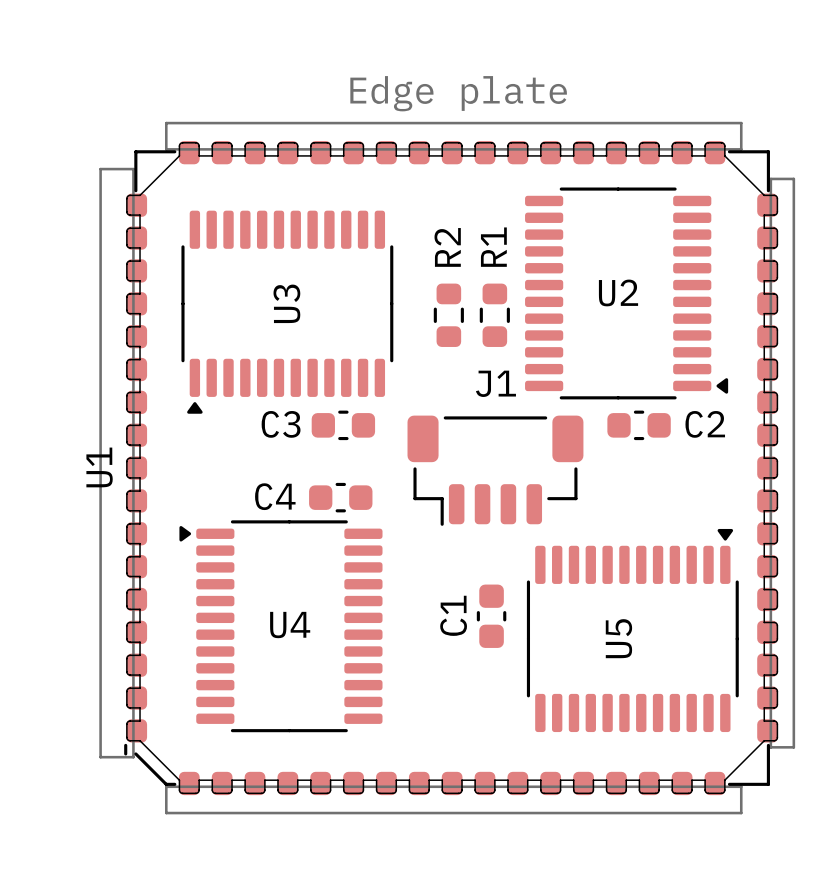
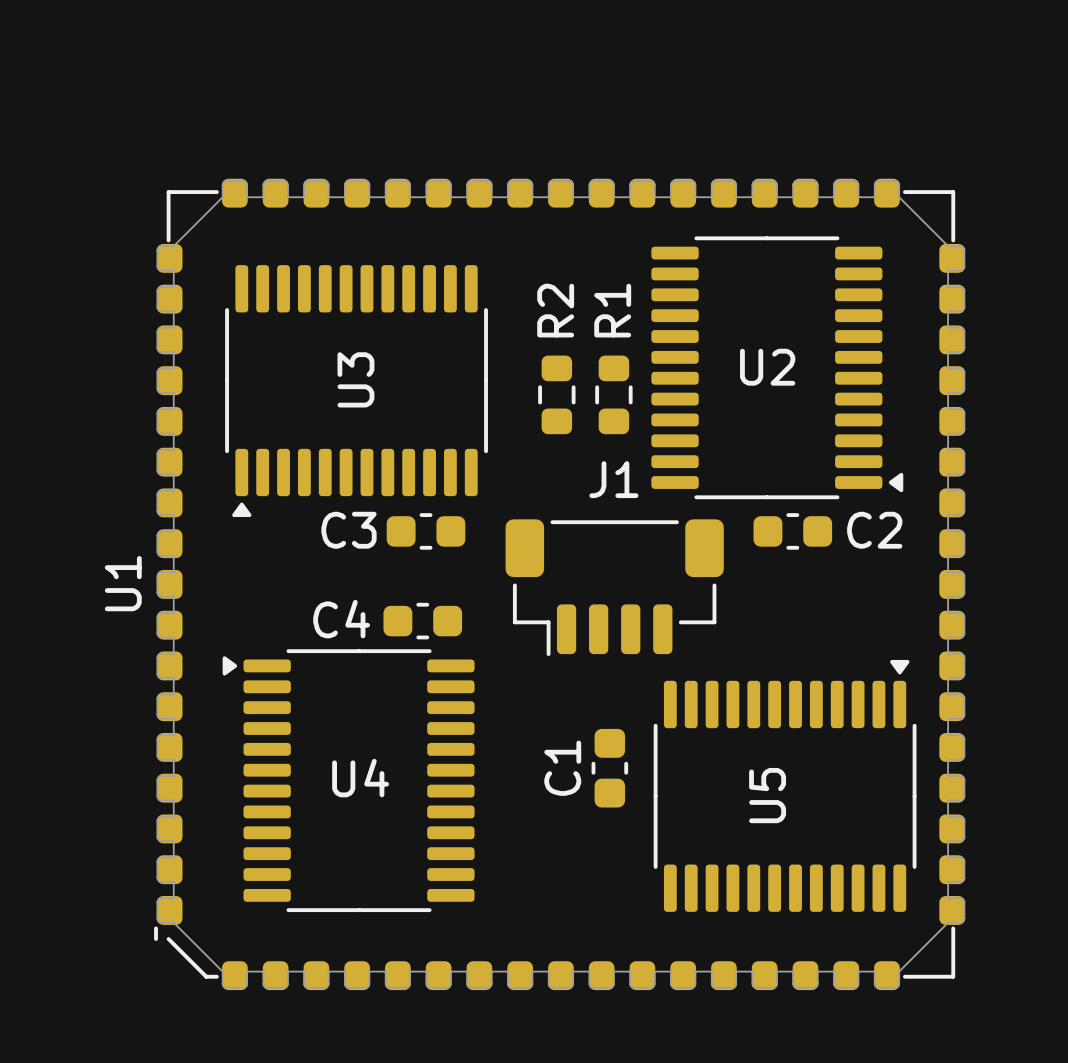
text: Edge plate (458, 93) -> none
line: (166, 123) (166, 149) (741, 149) (741, 123) (166, 123) -> none
line: (100, 169) (133, 169) (133, 757) (100, 757) (100, 169) -> none
line: (770, 178) (793, 178) (793, 747) (770, 747) (770, 178) -> none
line: (166, 786) (741, 786) (741, 813) (166, 813) (166, 786) -> none

